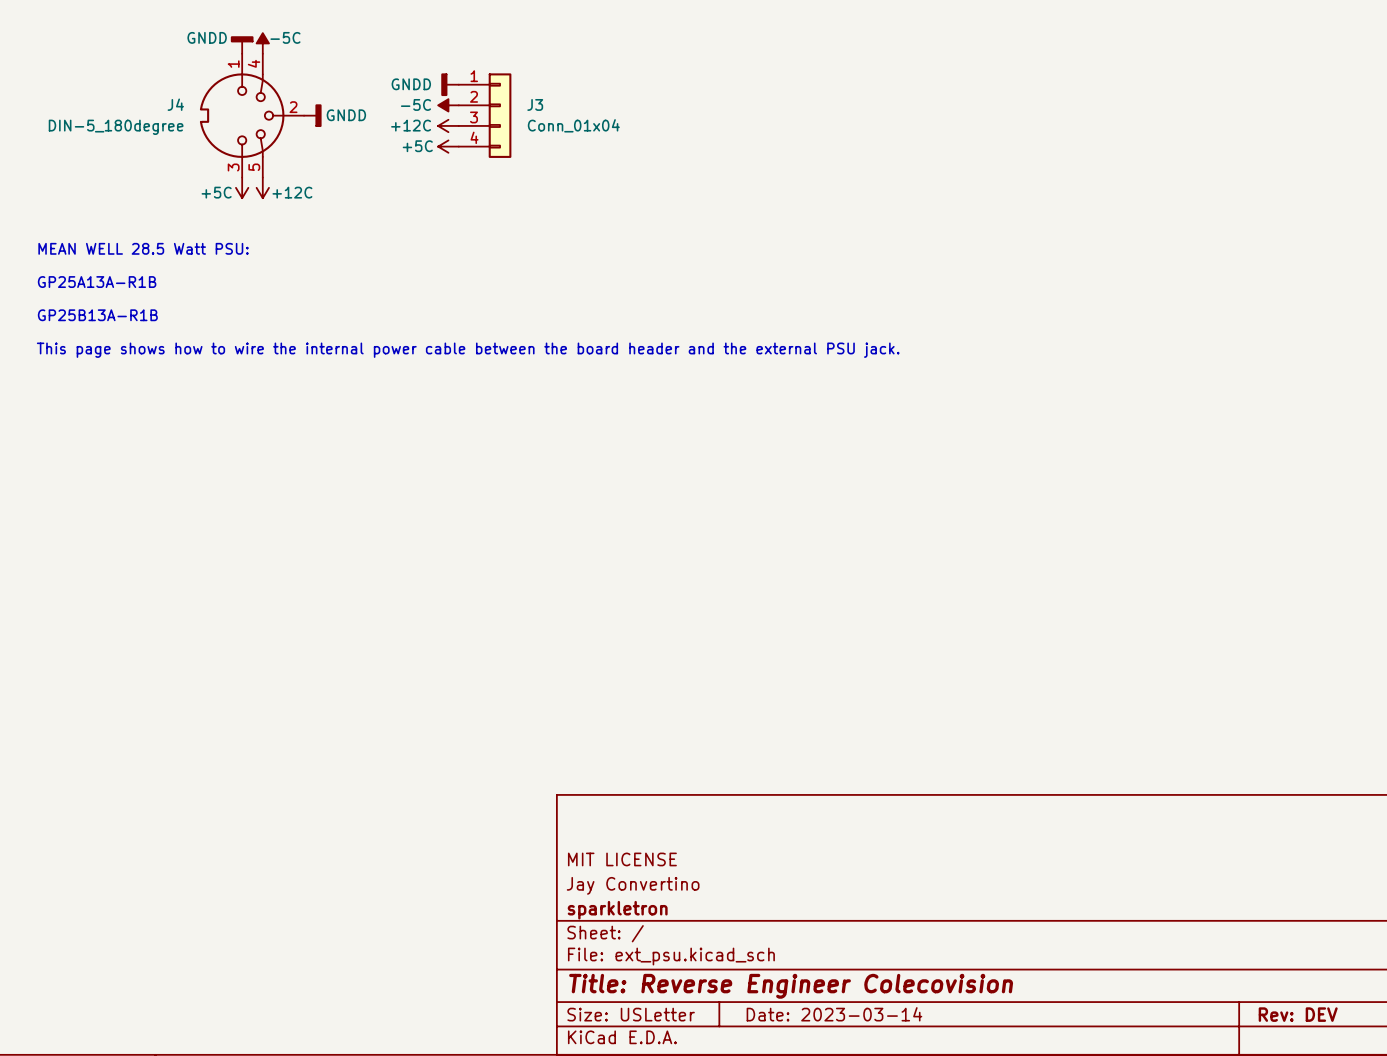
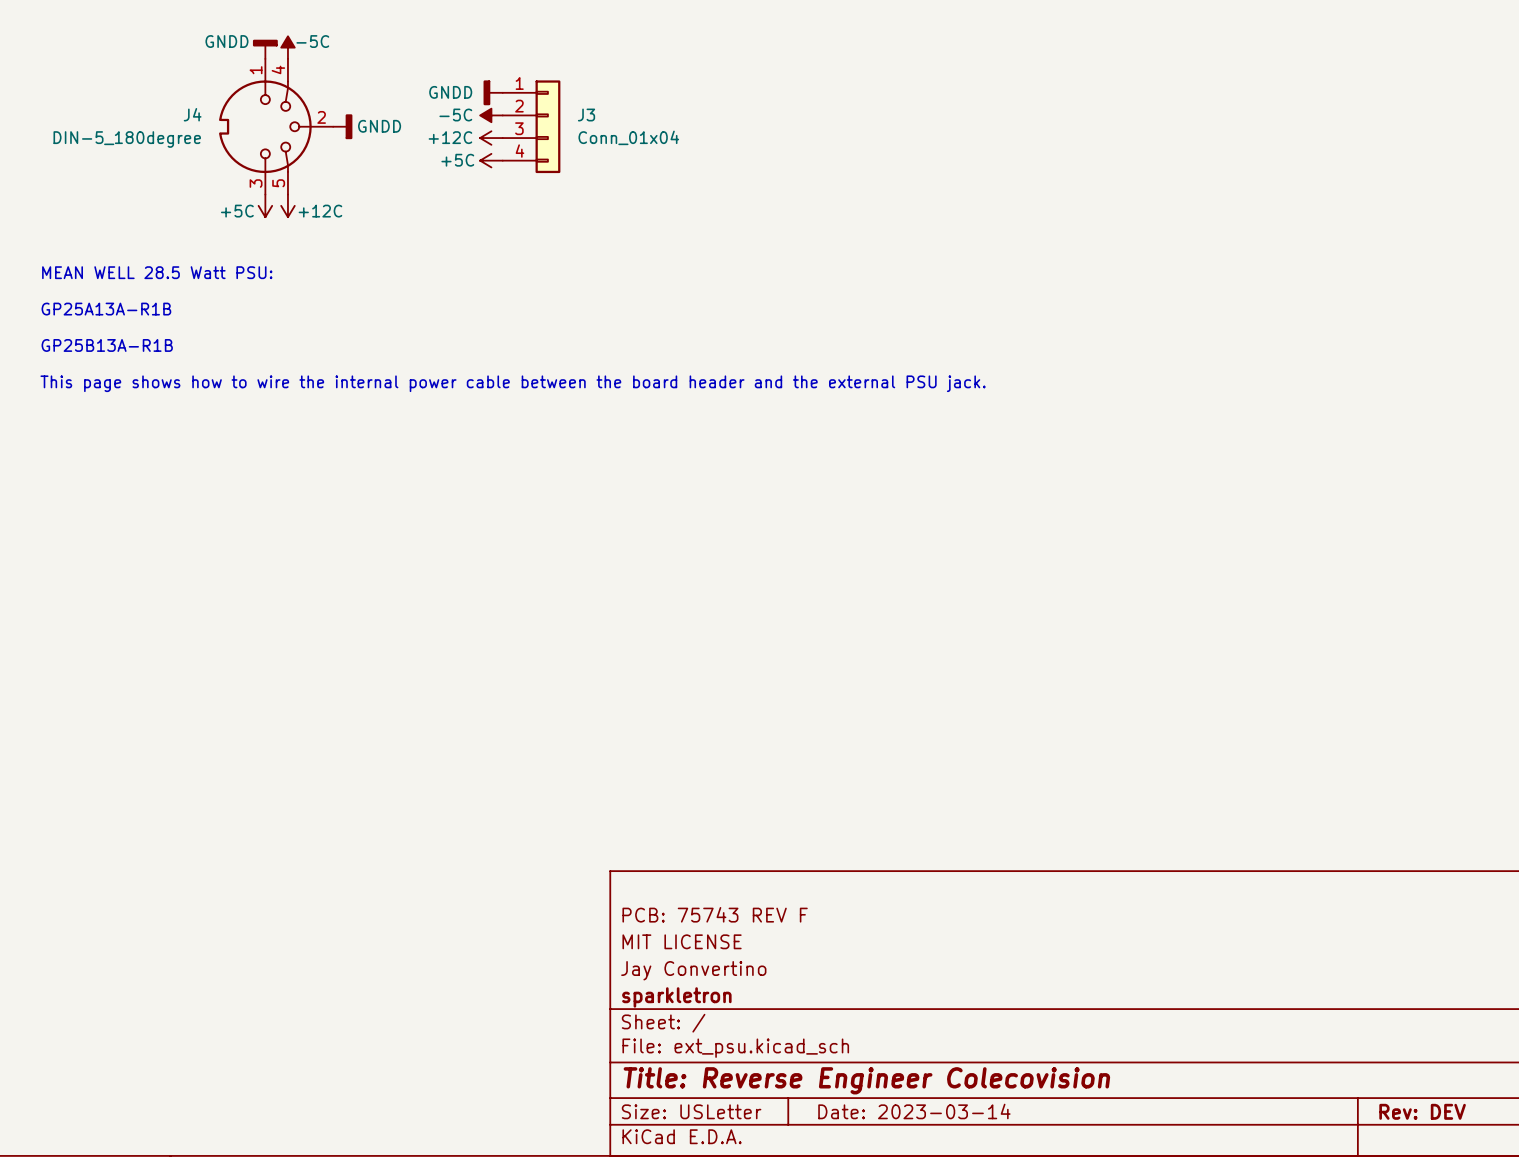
title block: none -> PCB: 75743 REV F (715, 914)

